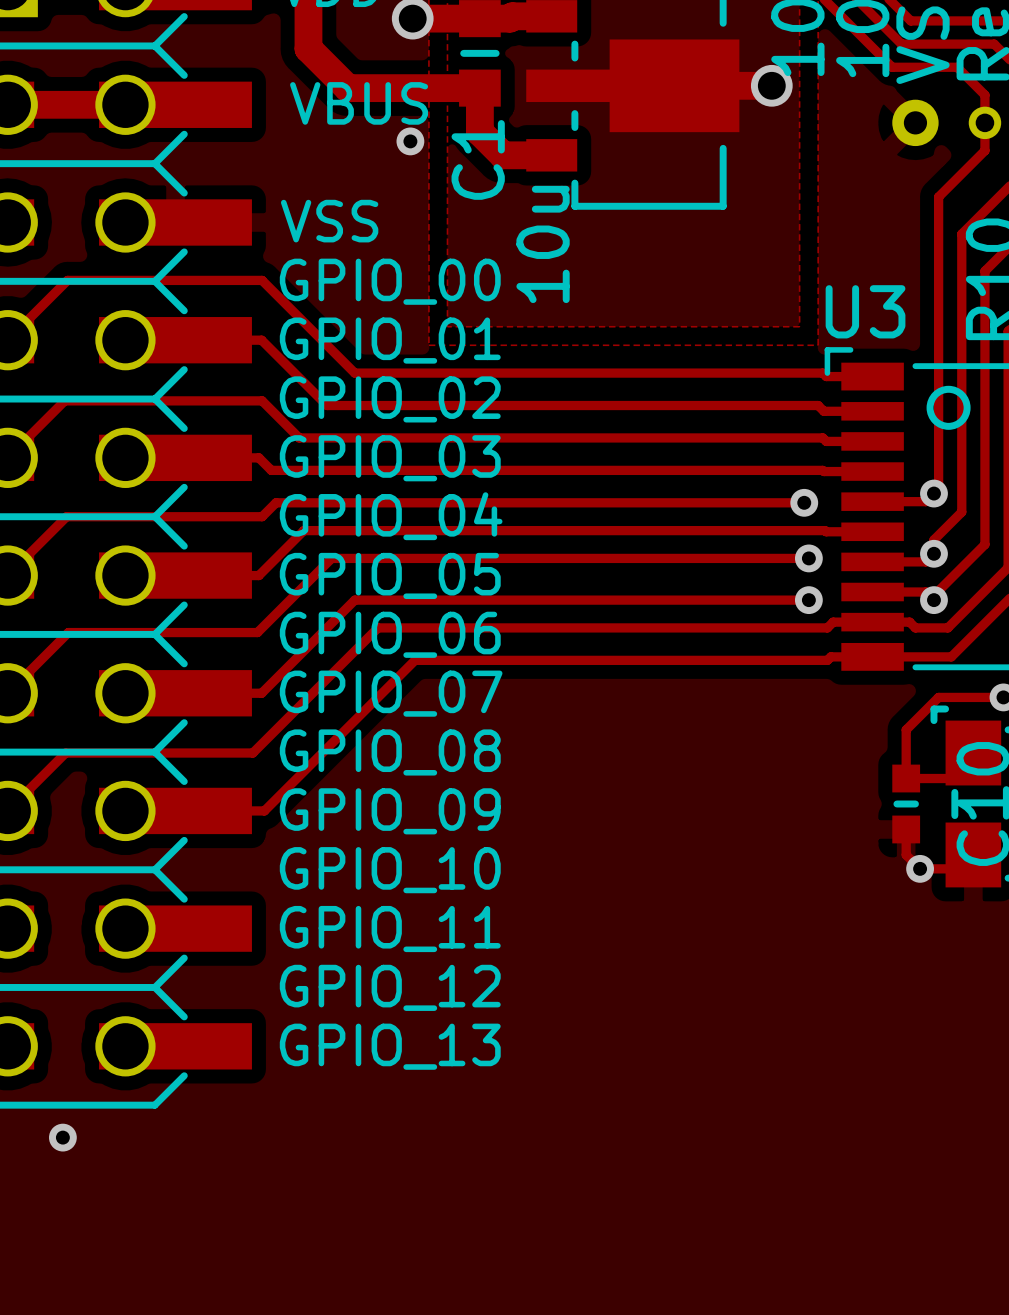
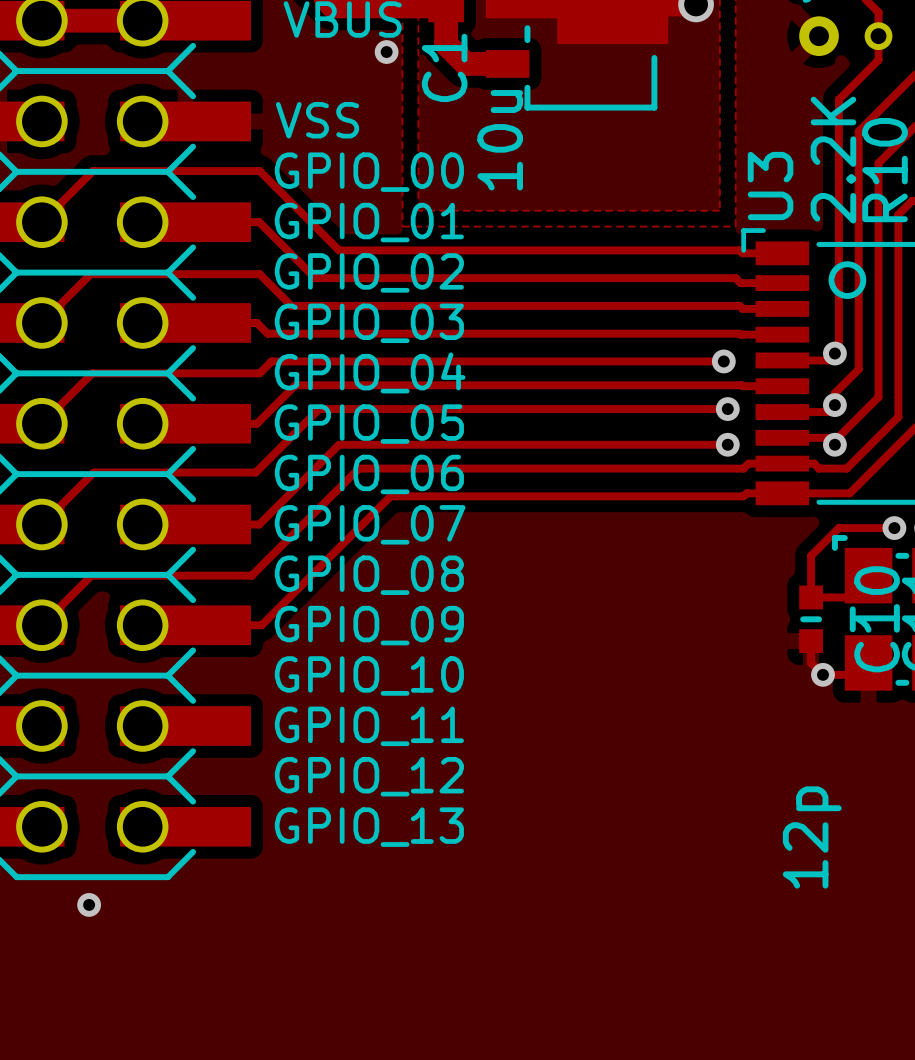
R10 value: none -> 2.2K (833, 160)
U3 name rotation: 0° (865, 311) -> 90° counterclockwise (770, 186)
C10 value: none -> 12p (812, 837)

